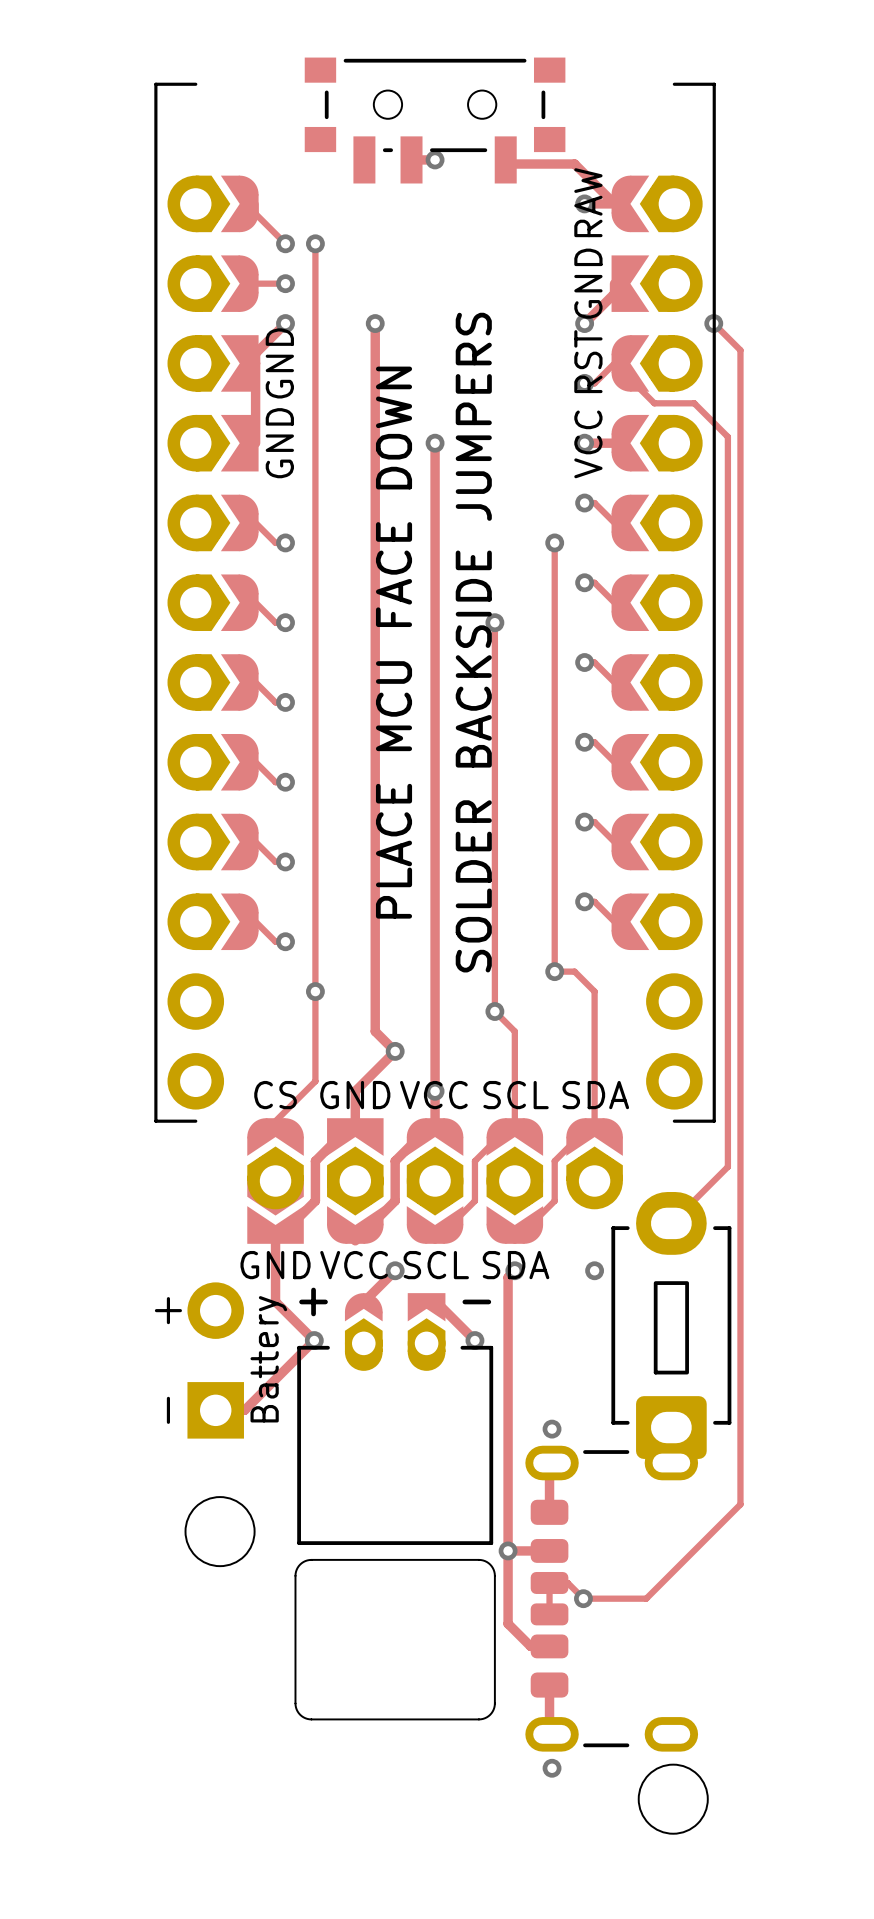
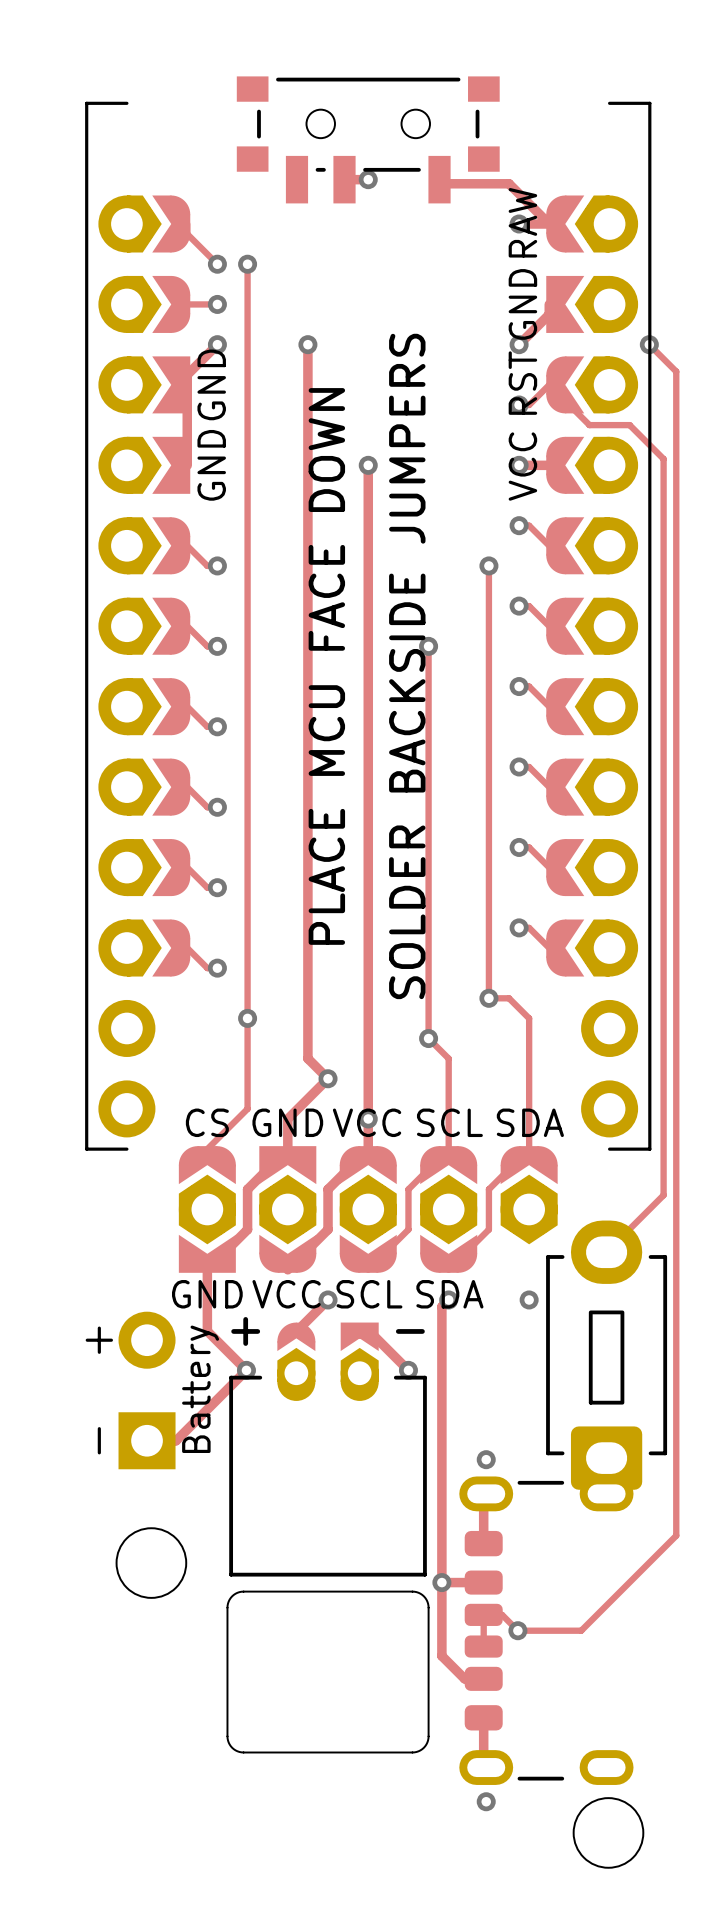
part footprint: [247, 1118, 623, 1244] -> [178, 1146, 558, 1273]

